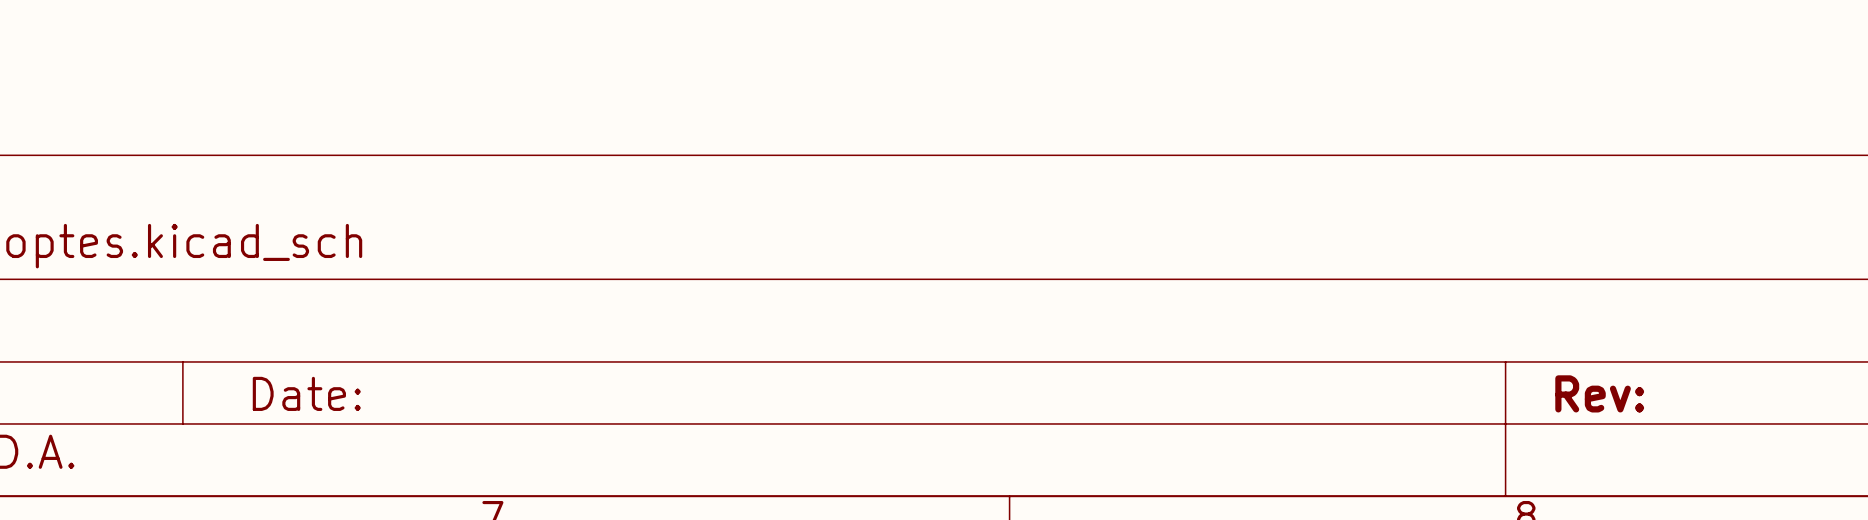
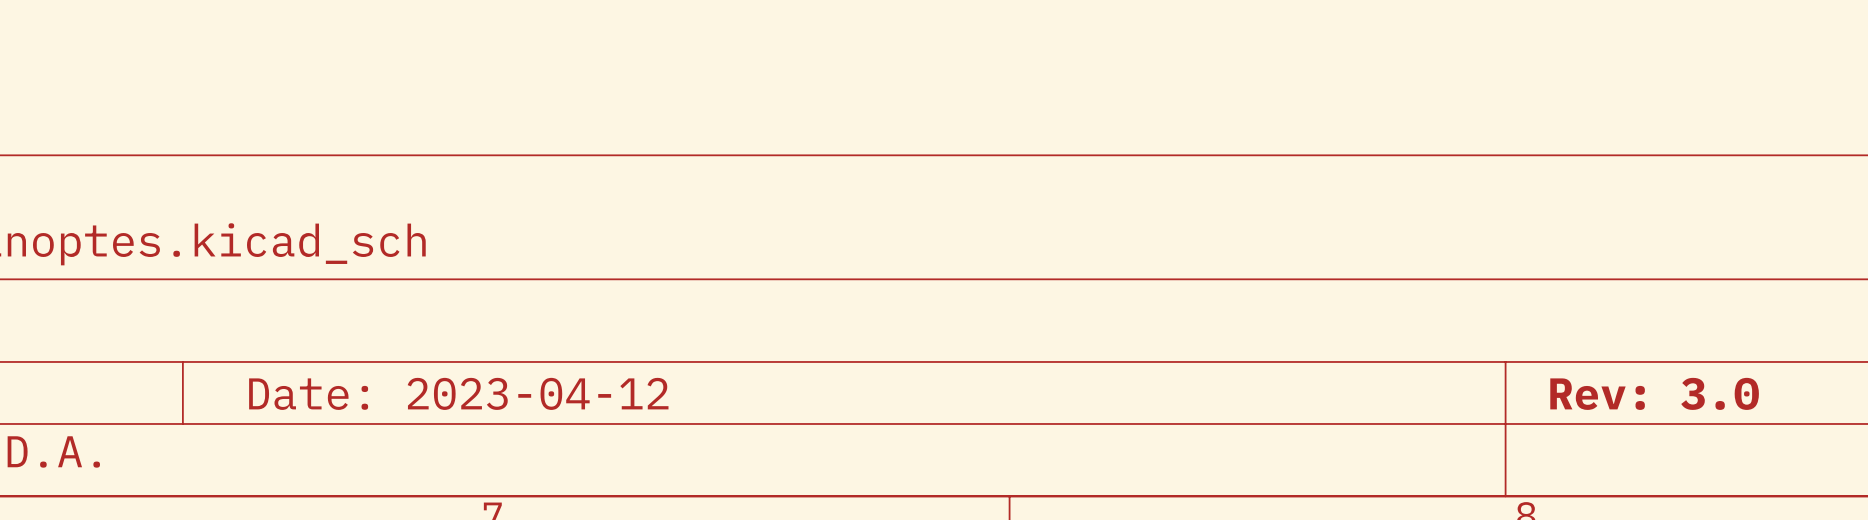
title block: Date: (306, 393) -> Date: 2023-04-12 (458, 393)
title block: Rev: (1599, 393) -> Rev: 3.0 (1654, 393)

